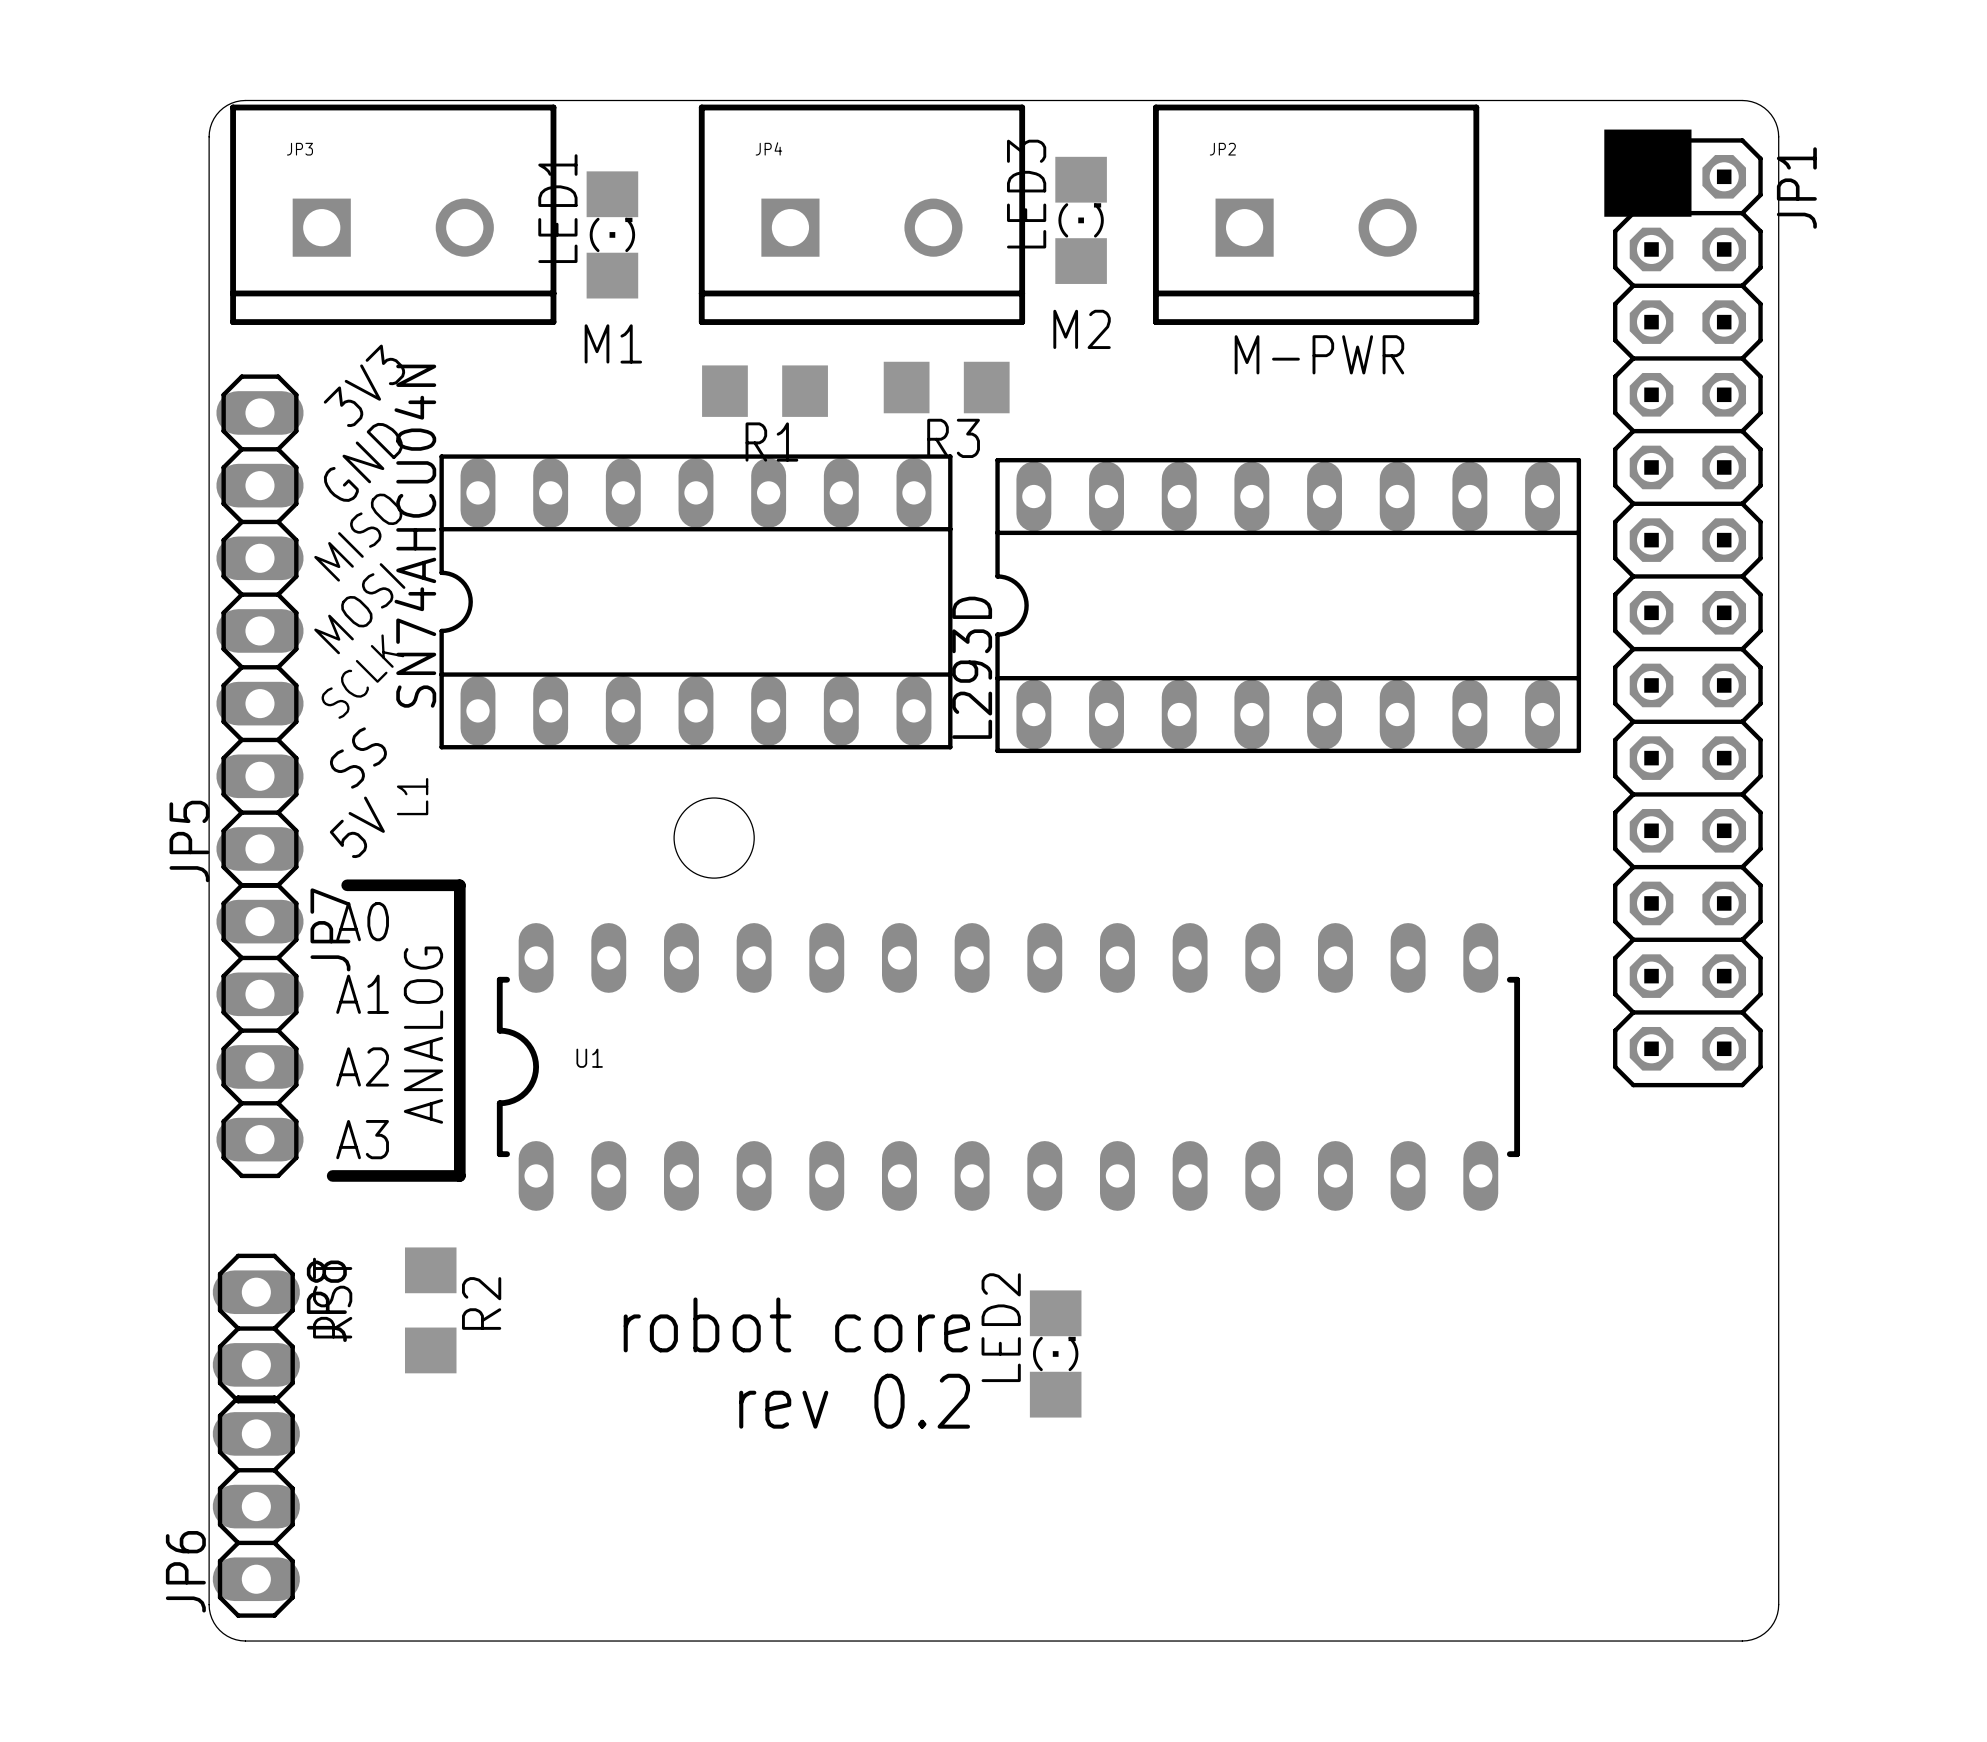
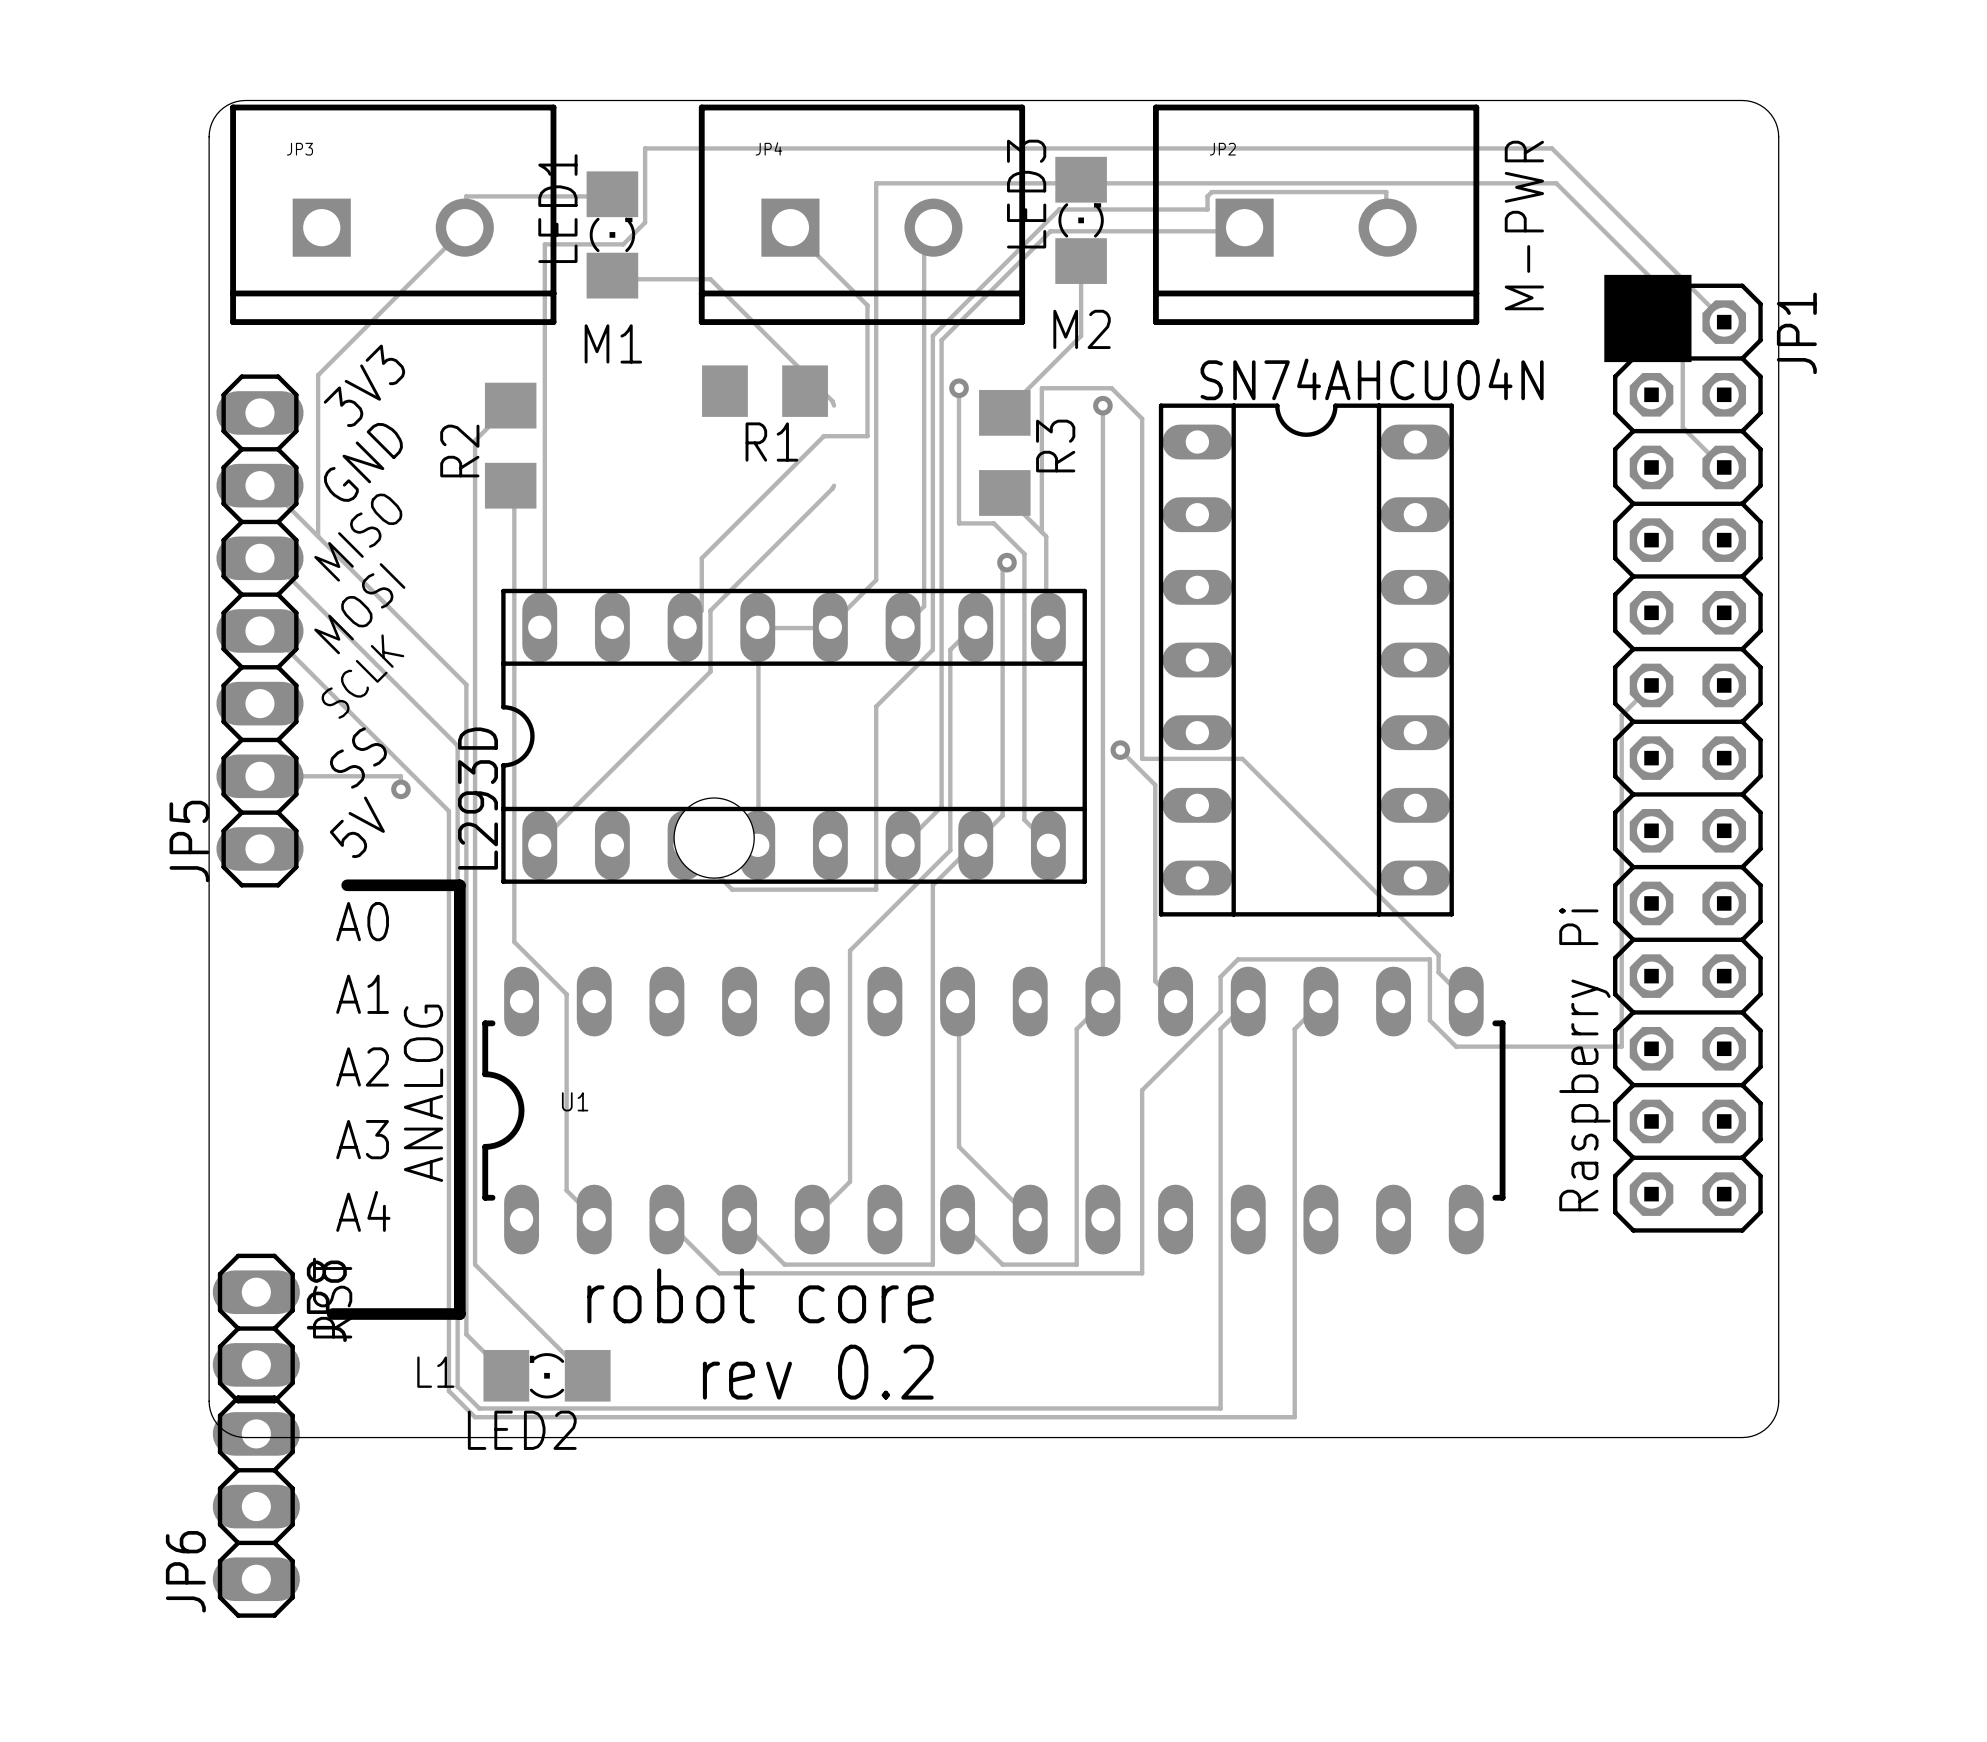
drawing position: (1647, 173) -> (1647, 318)
track: none -> (612, 194) (610, 196) (466, 196) (466, 226) (318, 375) (318, 536)
track: none -> (790, 227) (867, 305) (867, 436) (823, 436) (701, 558) (701, 610) (685, 627)
track: none -> (933, 227) (932, 231) (924, 240) (924, 606) (903, 627)
track: none -> (1244, 227) (1242, 231) (1050, 231) (941, 340) (941, 806) (903, 845)
track: none -> (1387, 227) (1386, 192) (1211, 192) (1207, 196) (1207, 209) (1059, 209) (932, 335) (932, 649) (876, 706) (876, 889) (732, 889) (688, 846) (685, 845)
track: none -> (1081, 261) (1081, 335) (1004, 412)
track: none -> (612, 275) (614, 279) (710, 279) (832, 401) (834, 405)
track: none -> (1724, 322) (1551, 148) (645, 148) (645, 222) (623, 244) (544, 244) (544, 619) (539, 627)
text rotation: 0° (1319, 354) -> 90° counterclockwise (1524, 225)
text position: M-PWR (1319, 354) -> M-PWR (1524, 225)
R3 rotation: 0° (946, 387) -> 90° clockwise (1004, 452)
R3 position: (946, 387) -> (1004, 452)
track: none -> (959, 388) (959, 523) (993, 523) (1024, 553) (1024, 819) (1048, 845)
via: none -> (959, 388)
track: none -> (510, 405) (475, 440) (475, 1264) (587, 1375)
track: none -> (1102, 405) (1102, 1003) (1076, 1029) (1076, 1264) (1002, 1264) (957, 1219)
via: none -> (1102, 405)
R3 name position: R3 (953, 438) -> R3 (1055, 446)
track: none -> (1724, 467) (1682, 427) (1682, 309) (1556, 183) (876, 183) (876, 580) (830, 627) (758, 628)
track: none -> (267, 485) (466, 684) (466, 1334) (506, 1375)
track: none -> (510, 485) (514, 488) (514, 941) (566, 994) (566, 1190) (594, 1219)
track: none -> (834, 485) (710, 610) (710, 671) (540, 841) (539, 845)
track: none -> (1004, 492) (1046, 536) (1046, 623) (1048, 627)
track: none -> (1041, 532) (1041, 388) (1111, 388) (1142, 418) (1142, 758) (1242, 758) (1438, 955) (1438, 972) (1466, 1001)
track: none -> (267, 558) (270, 558) (457, 745) (457, 1386) (479, 1408) (1220, 1408) (1220, 1029) (1248, 1001)
track: none -> (1006, 562) (1002, 567) (1002, 815) (976, 841) (975, 845) (972, 846) (932, 885) (932, 1264) (784, 1264) (739, 1219)
via: none -> (1006, 562)
SN74AHCU04N rotation: 0° (695, 601) -> 90° clockwise (1306, 660)
SN74AHCU04N position: (695, 601) -> (1306, 660)
L293D position: (1288, 605) -> (794, 736)
JP1 position: (1687, 612) -> (1687, 758)
track: none -> (975, 627) (972, 628) (950, 649) (950, 850) (850, 950) (850, 1181) (812, 1219)
track: none -> (758, 628) (757, 845)
track: none -> (267, 630) (448, 811) (448, 1391) (475, 1417) (1294, 1417) (1294, 1029) (1320, 1001)
track: none -> (1651, 685) (1621, 715) (1621, 1046) (1456, 1046) (1429, 1020) (1429, 959) (1238, 959) (1220, 976) (1220, 1011) (1142, 1090) (1142, 1273) (719, 1273) (666, 1219)
track: none -> (1120, 750) (1155, 785) (1155, 981) (1175, 1001)
via: none -> (1120, 750)
track: none -> (267, 776) (400, 776) (400, 789)
via: none -> (400, 789)
text rotation: 0° (412, 796) -> 90° clockwise (435, 1372)
text position: L1 (412, 796) -> L1 (435, 1372)
track: none -> (957, 1001) (959, 1146) (1030, 1219)
JP7: (259, 1030) -> none
text position: ANALOG (423, 1035) -> ANALOG (423, 1093)
text: none -> Raspberry Pi (1584, 1059)
U1 position: (1008, 1066) -> (993, 1110)
line: (332, 1175) (459, 1175) -> (332, 1314) (459, 1314) (459, 1175)
text: none -> A4 (363, 1211)
R2 name position: R2 (481, 1303) -> R2 (459, 451)
R2 position: (430, 1310) -> (510, 445)
text position: robot core (796, 1324) -> robot core (760, 1295)
LED2 rotation: 0° (1055, 1353) -> 90° counterclockwise (547, 1375)
LED2 position: (1055, 1353) -> (547, 1375)
board edge: (209, 1401) (209, 1609) (213, 1622) (223, 1633) (236, 1639) (245, 1641) (1747, 1640) (1760, 1636) (1768, 1630) (1773, 1622) (1778, 1609) (1778, 1401) -> (209, 1401) (211, 1415) (219, 1426) (231, 1434) (245, 1437) (1742, 1437) (1756, 1434) (1768, 1426) (1775, 1415) (1778, 1401)
text position: rev 0.2 (854, 1401) -> rev 0.2 (818, 1372)

